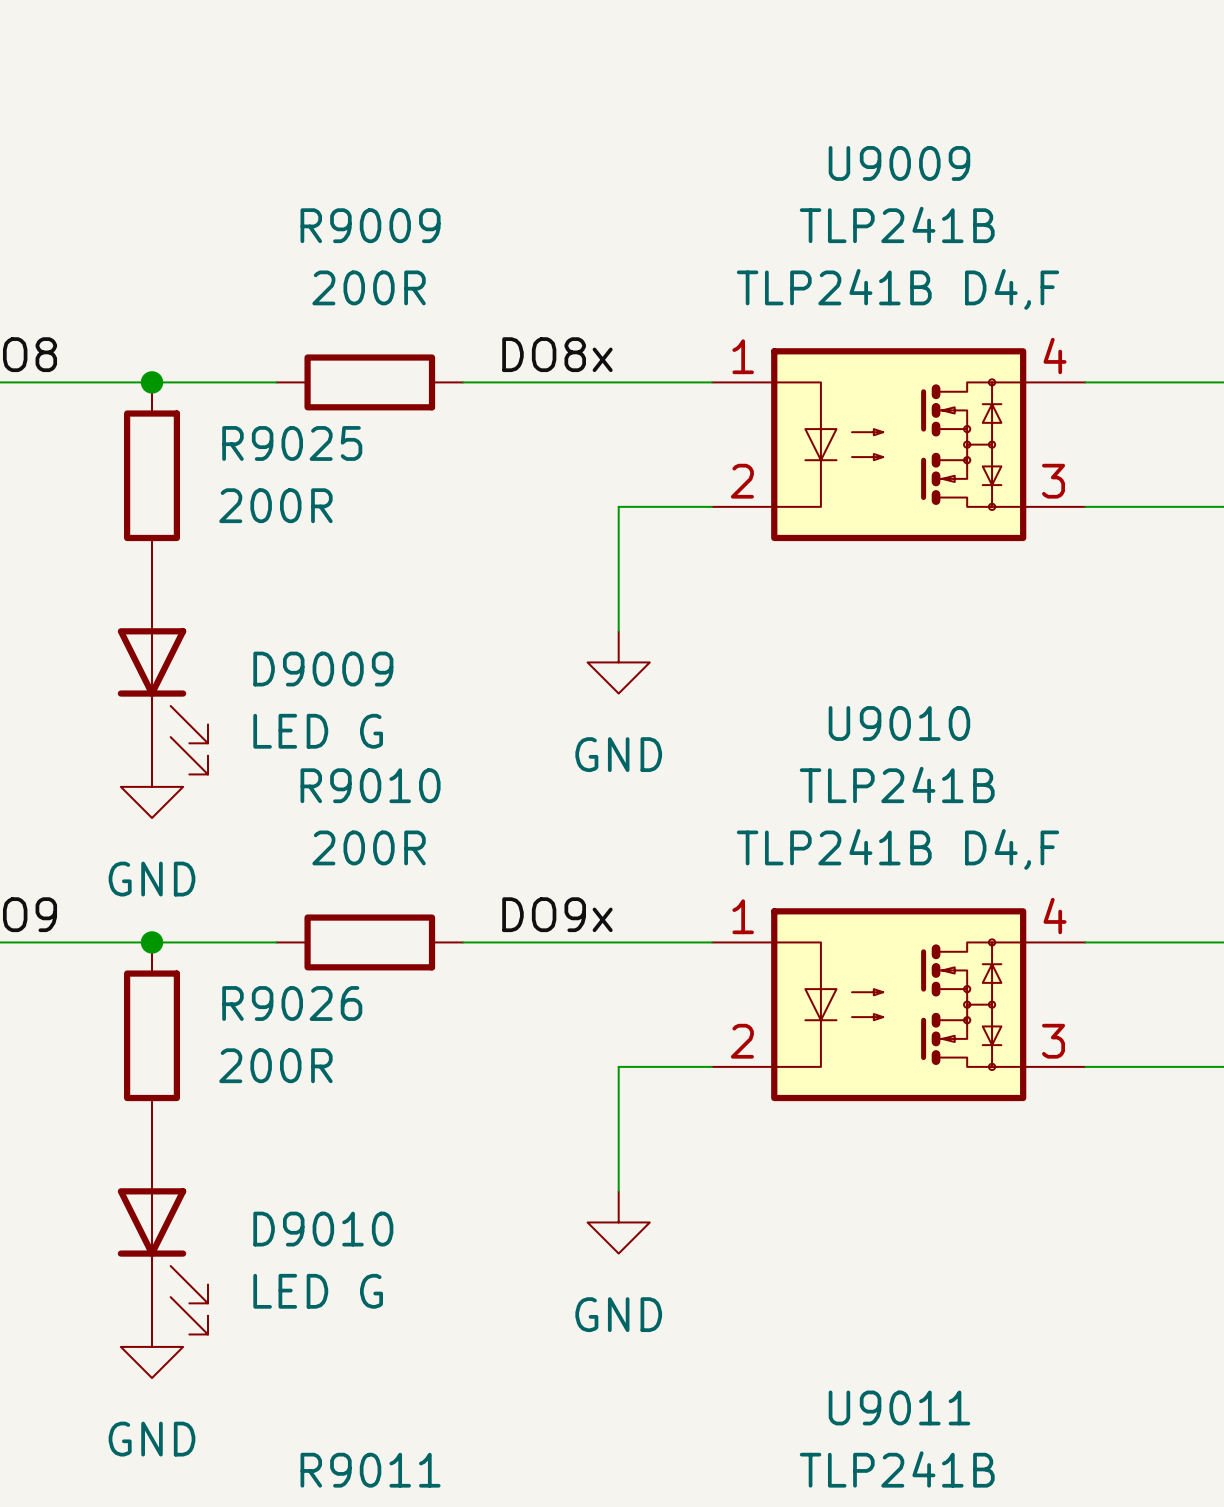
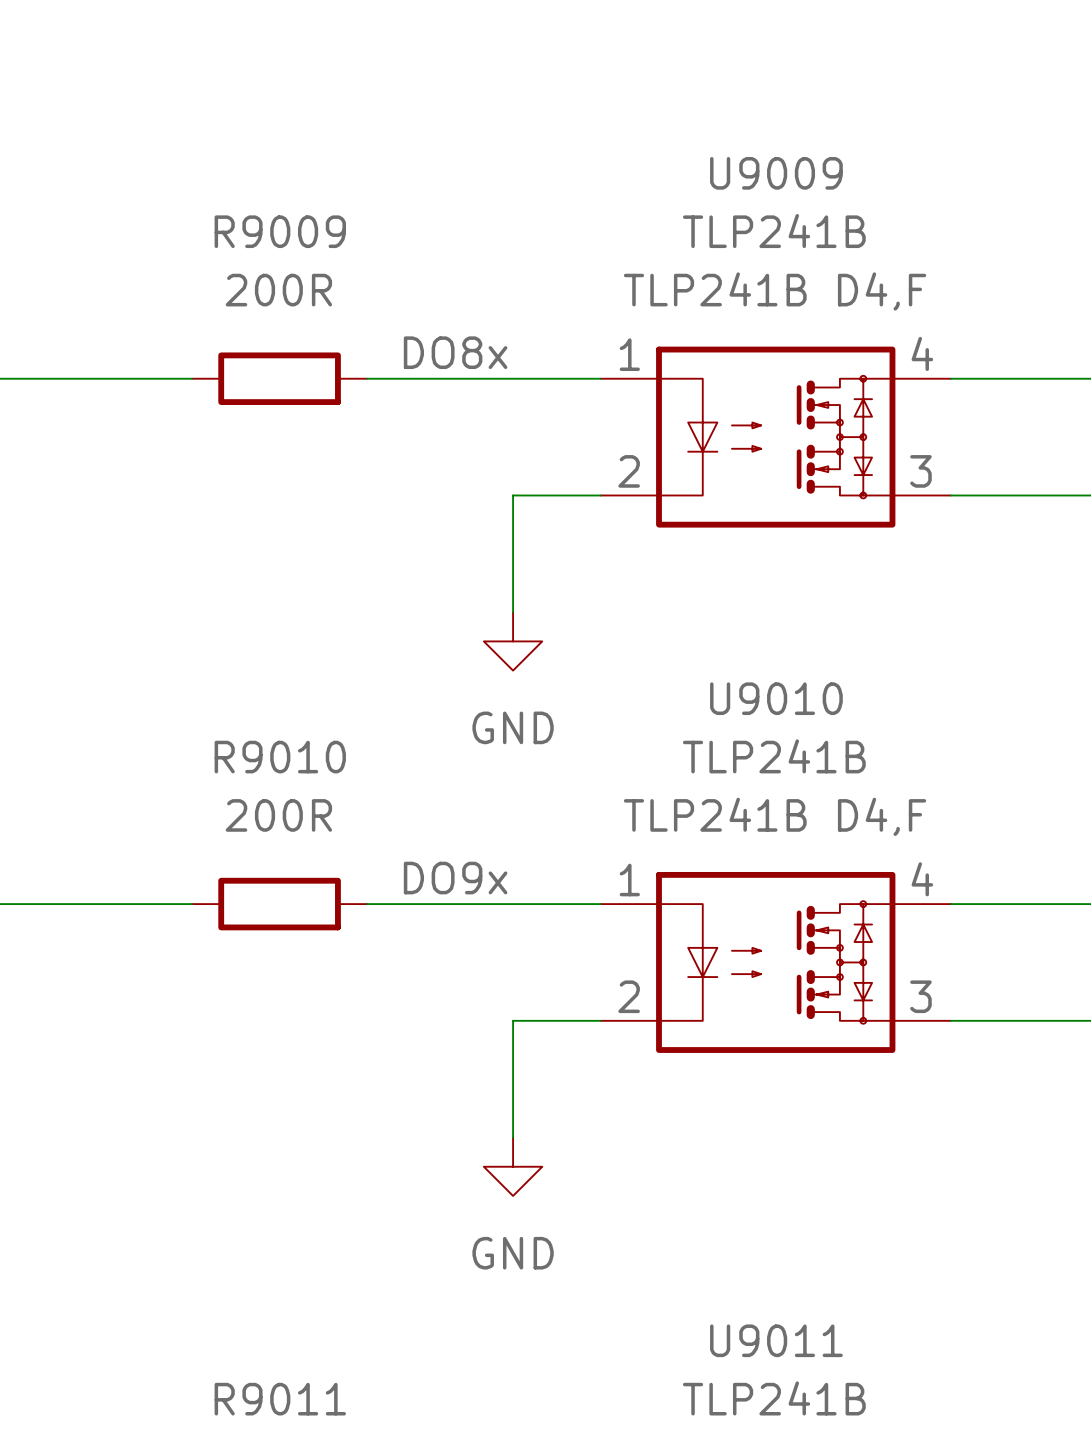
junction: (152, 382) -> none
R9025: 200R (152, 475) -> none
D9009: LED G (162, 671) -> none
power symbol: GND (152, 786) -> none
junction: (152, 942) -> none
R9026: 200R (152, 1035) -> none
D9010: LED G (162, 1231) -> none
power symbol: GND (152, 1346) -> none

